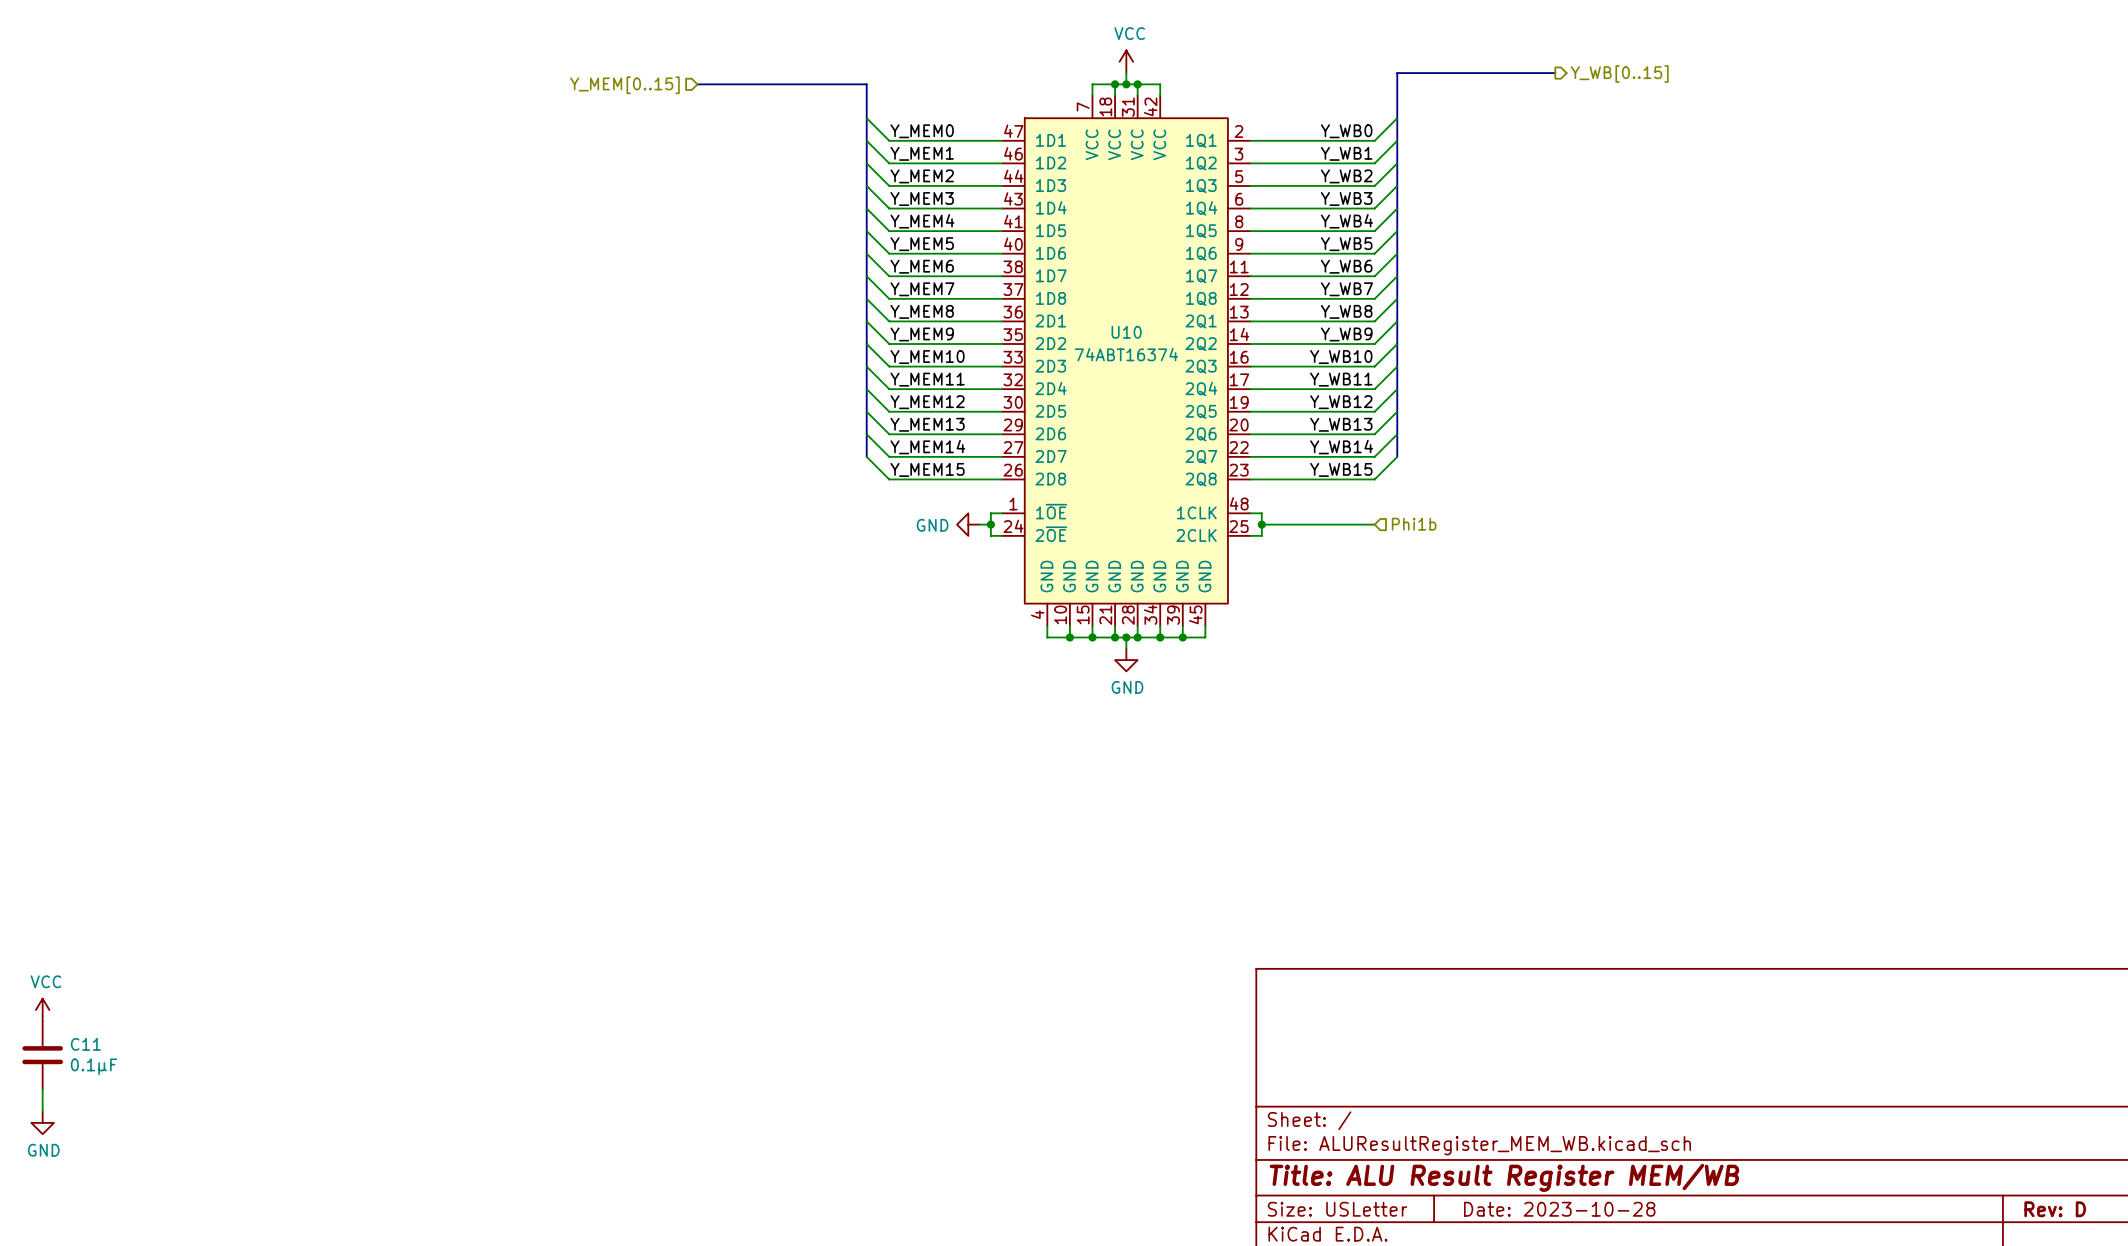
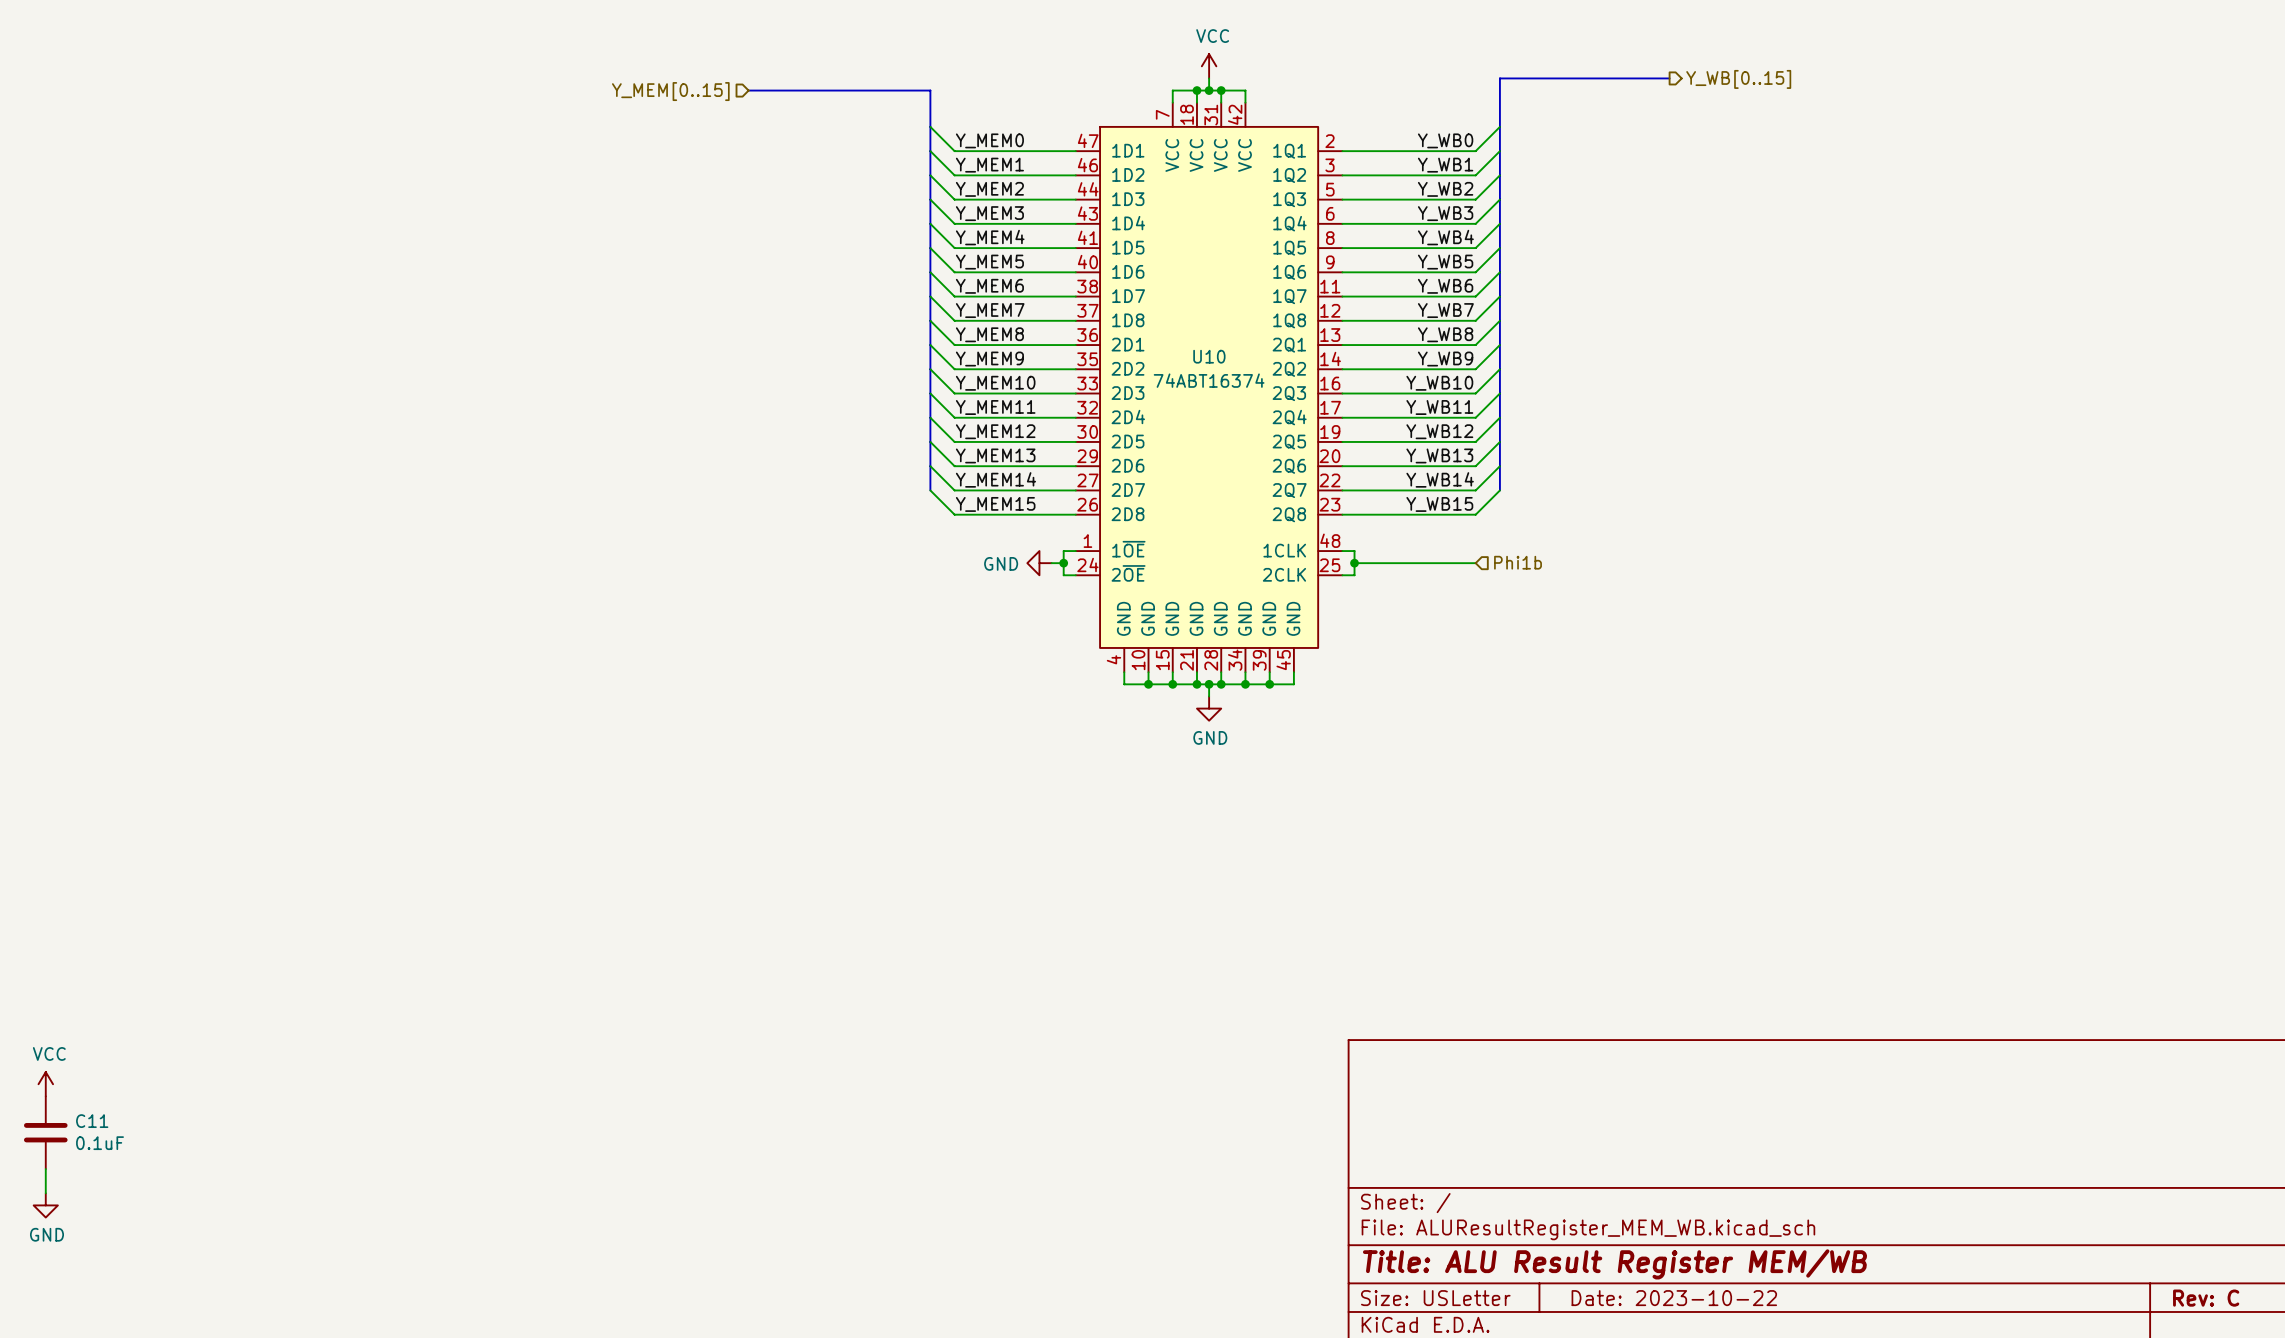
C11 value: 0.1μF (93, 1066) -> 0.1uF (100, 1143)
title block: Date: 2023-10-28 (1559, 1209) -> Date: 2023-10-22 (1674, 1298)
title block: Rev: D (2055, 1209) -> Rev: C (2206, 1298)

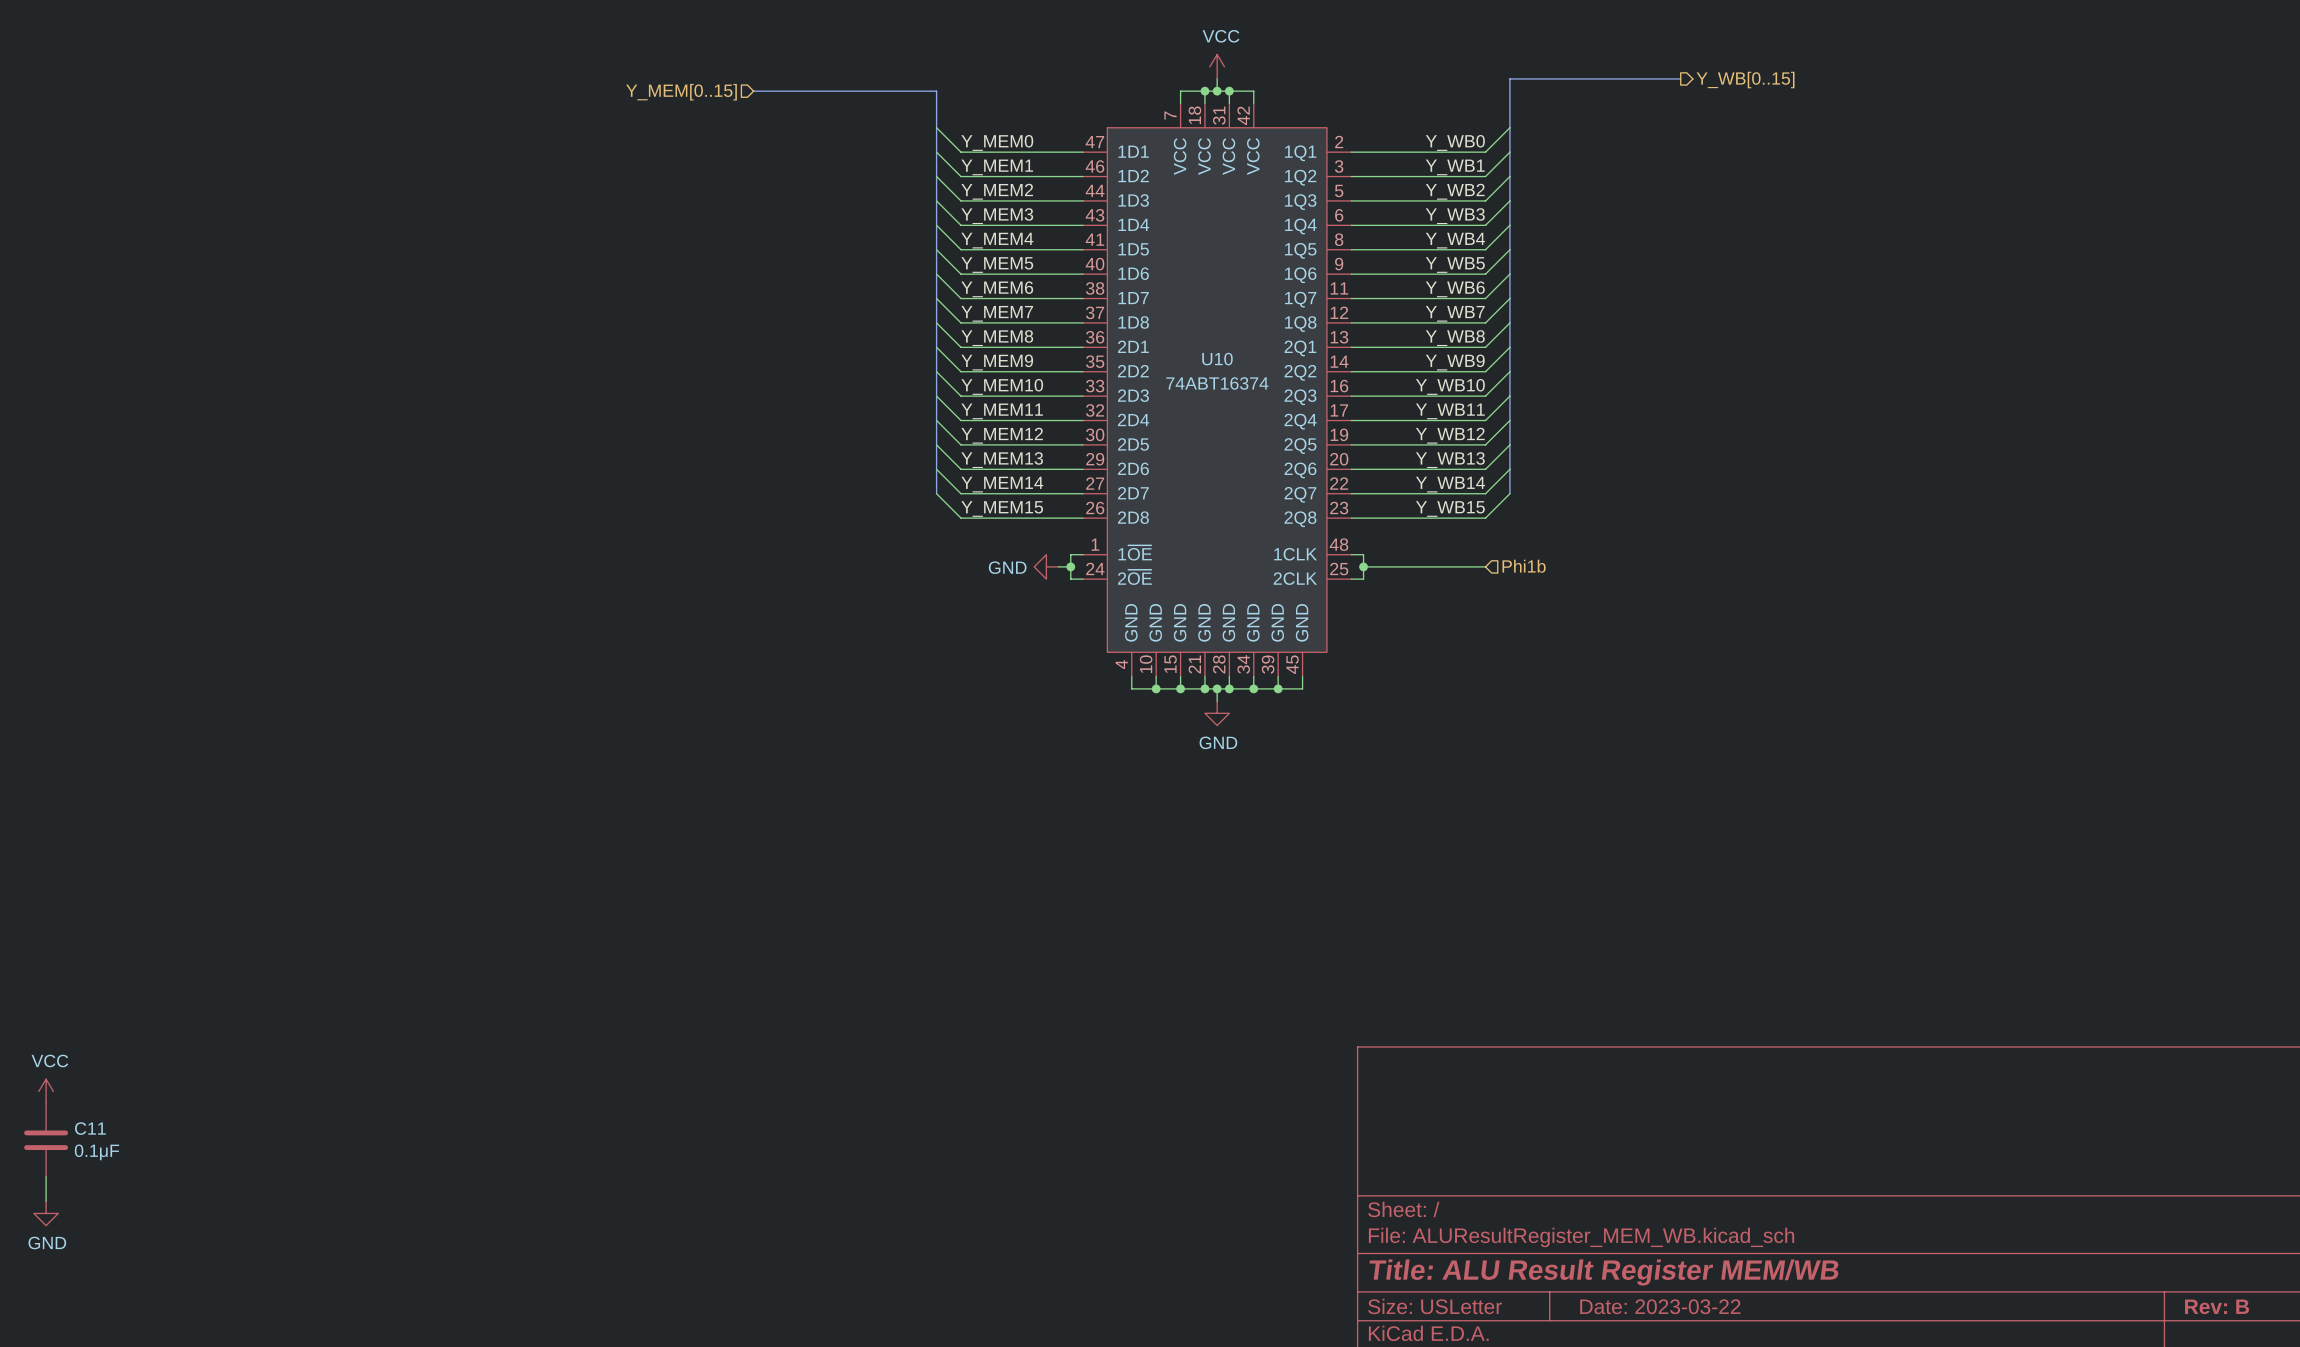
C11 value: 0.1uF (100, 1143) -> 0.1μF (96, 1152)
title block: Date: 2023-10-22 (1674, 1298) -> Date: 2023-03-22 (1660, 1306)
title block: Rev: C (2206, 1298) -> Rev: B (2217, 1306)

